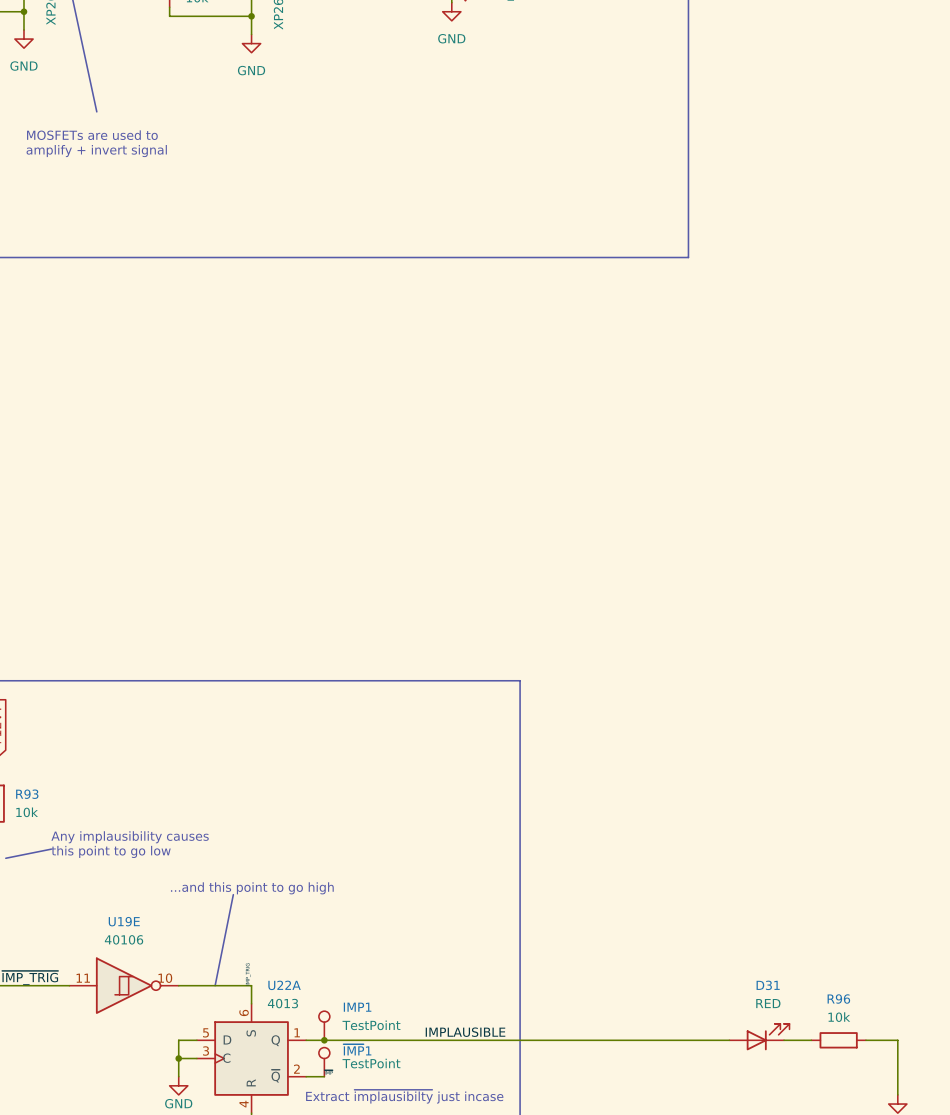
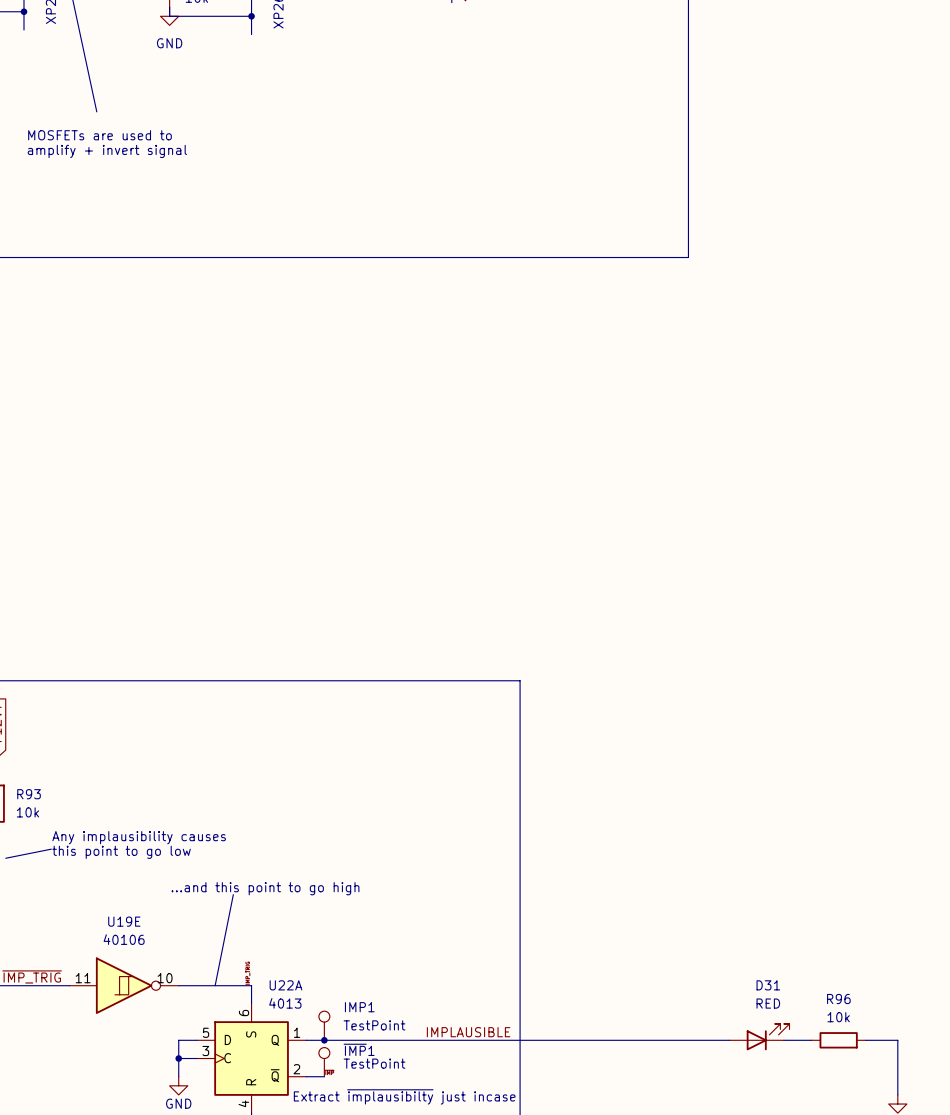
power symbol: GND (451, 11) -> none
power symbol: none -> GND (169, 16)
power symbol: GND (23, 39) -> none
power symbol: GND (251, 43) -> none

